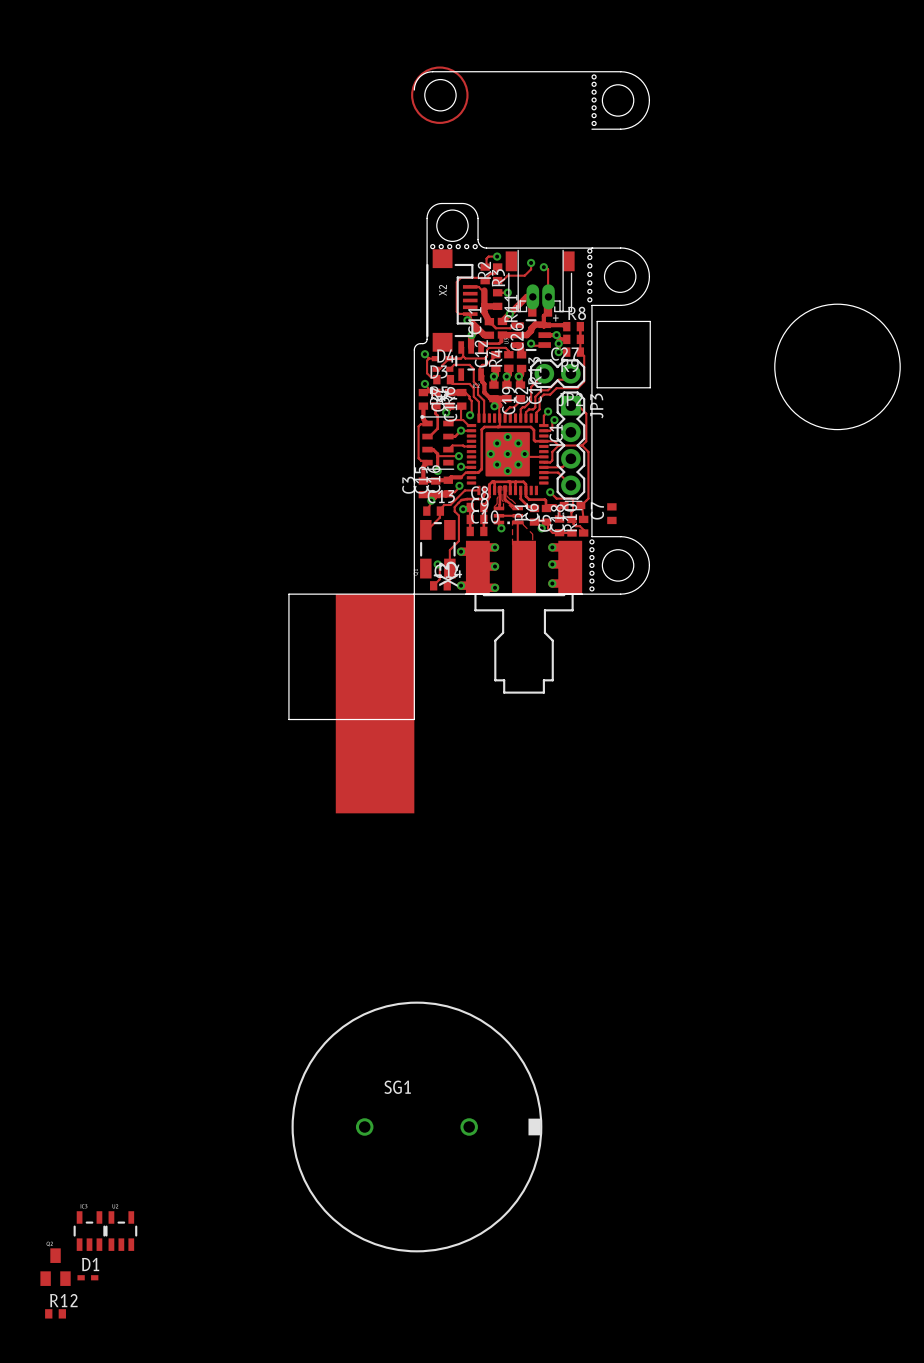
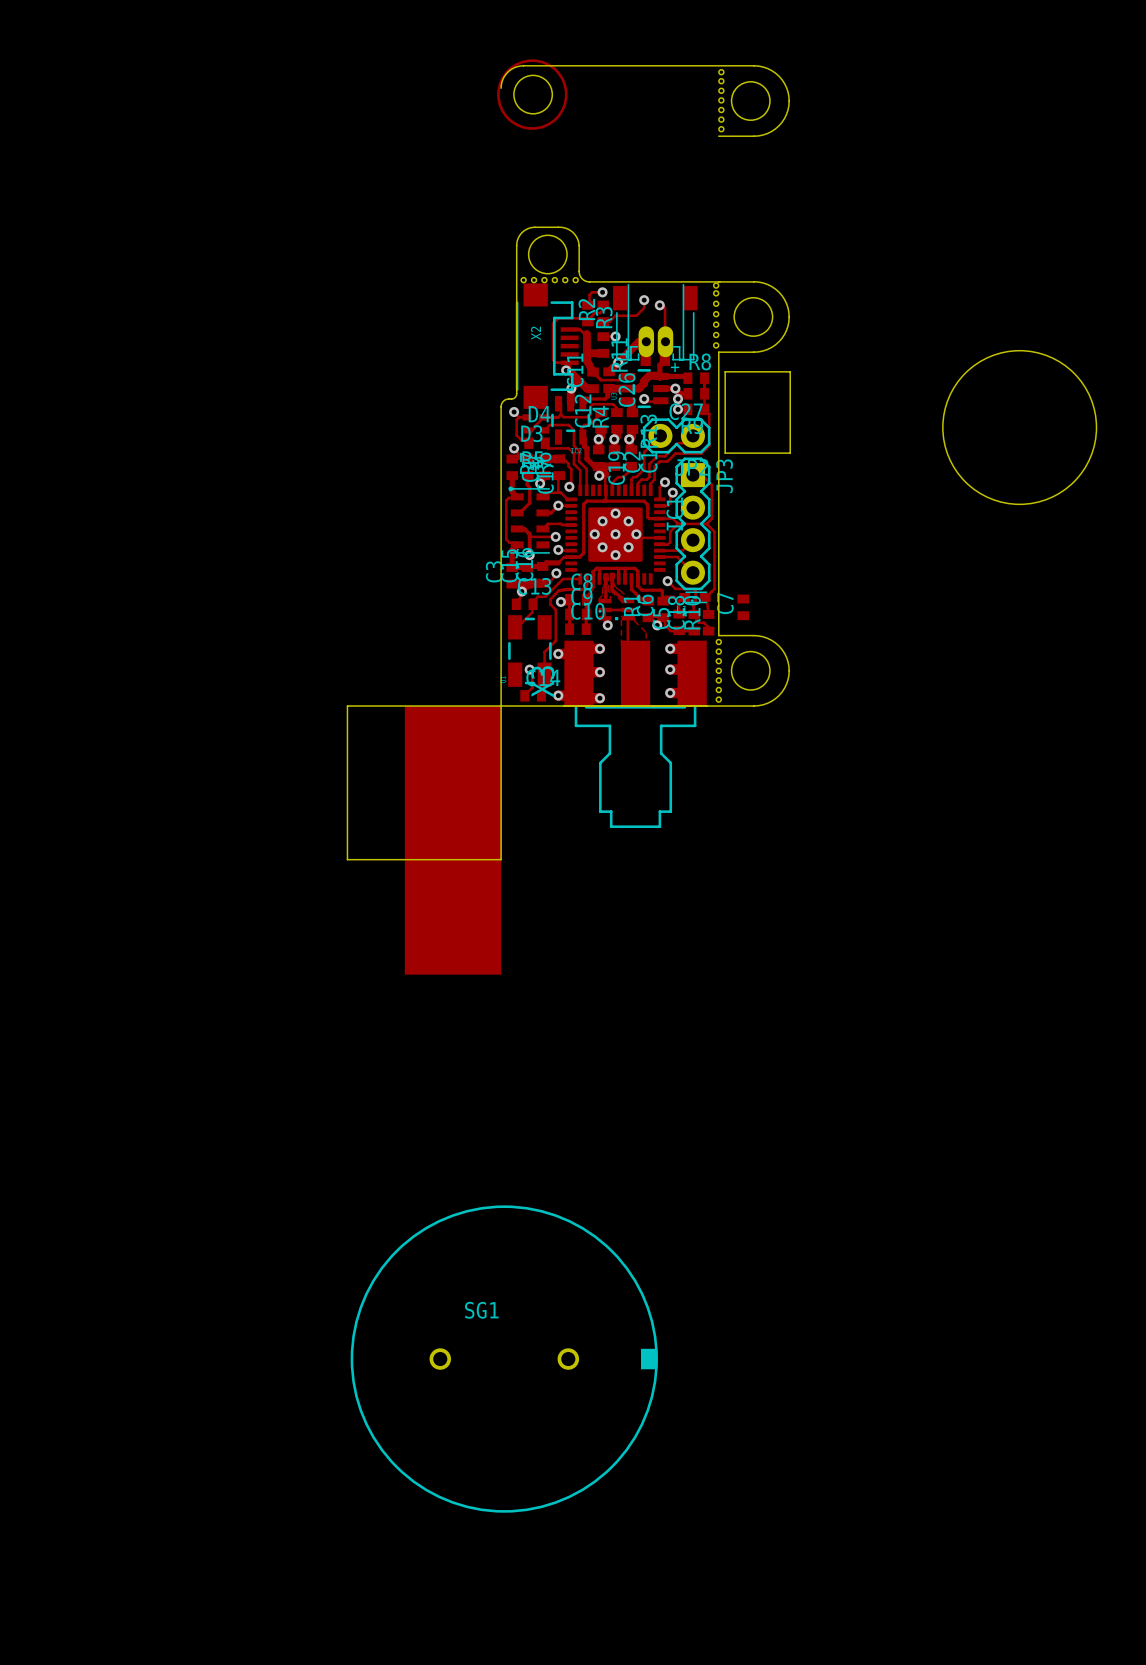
part: (89, 1231) -> none
part: (121, 1231) -> none
part: (55, 1267) -> none
D1: (87, 1277) -> none
R12: (55, 1313) -> none

